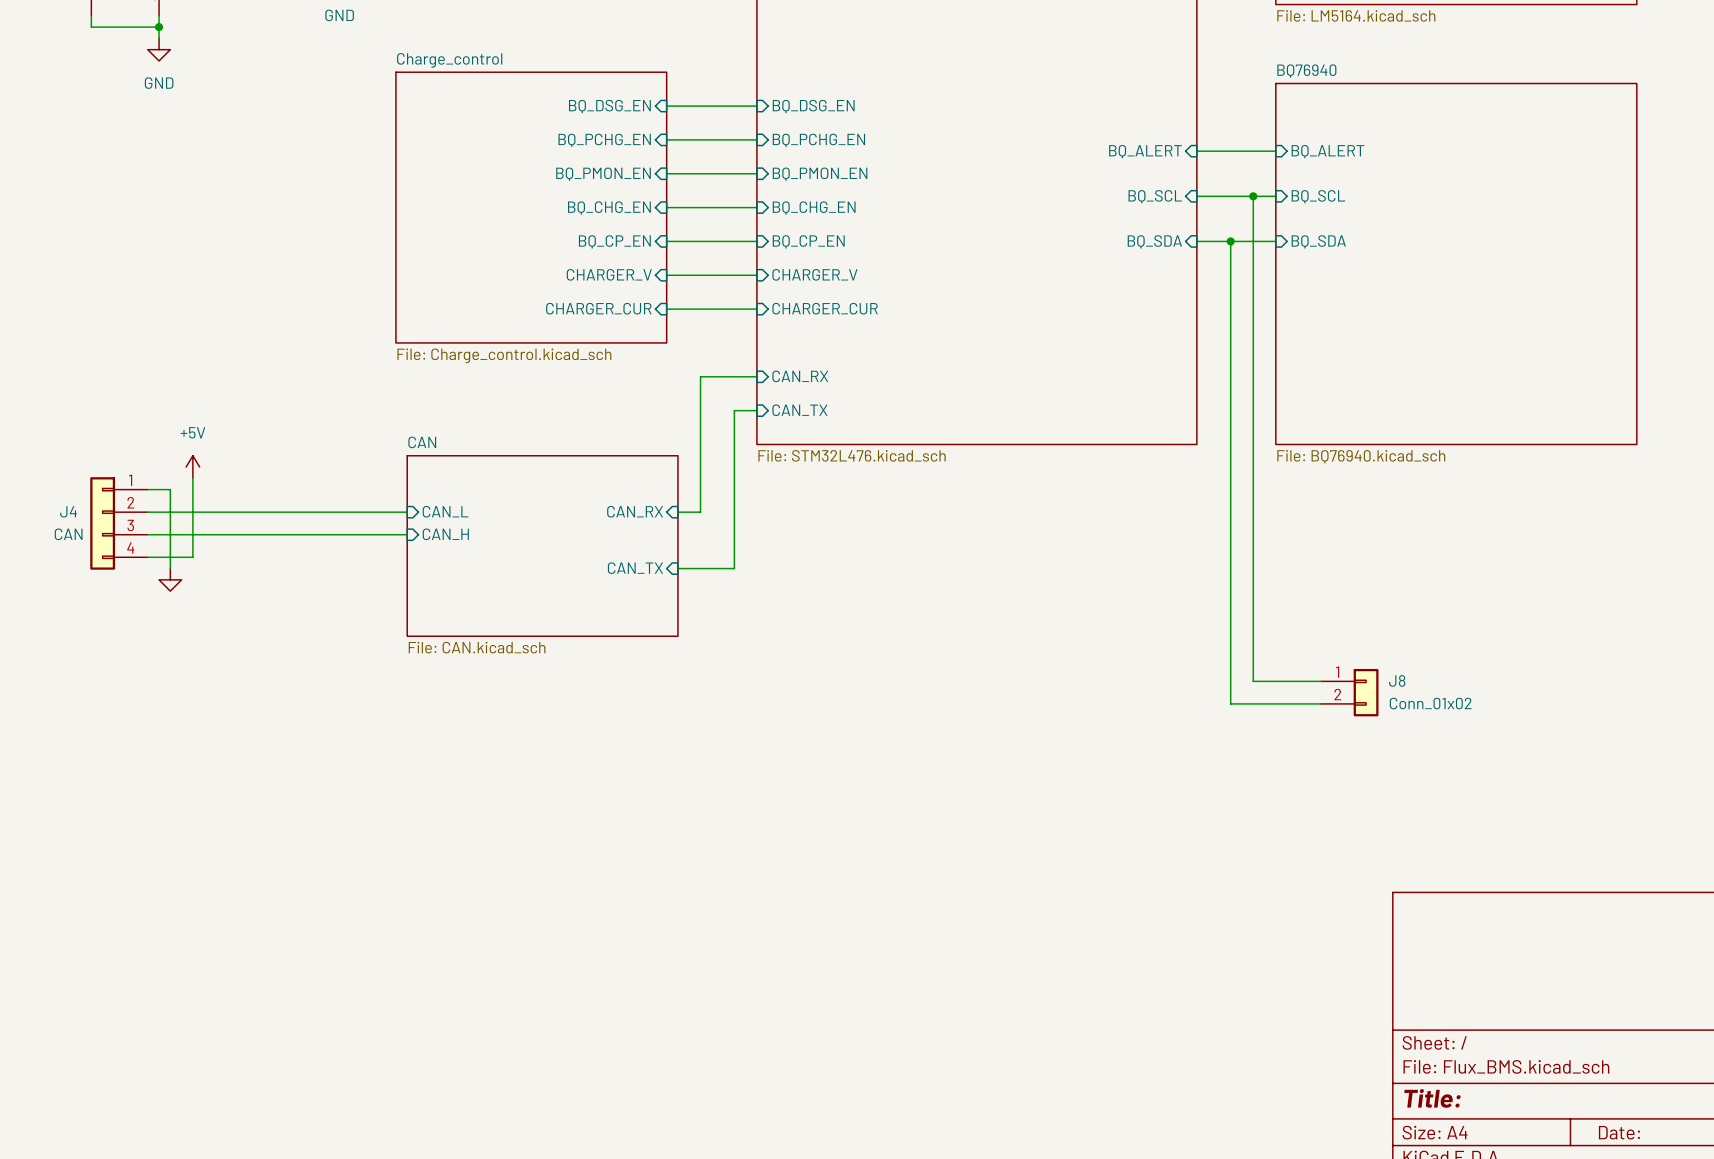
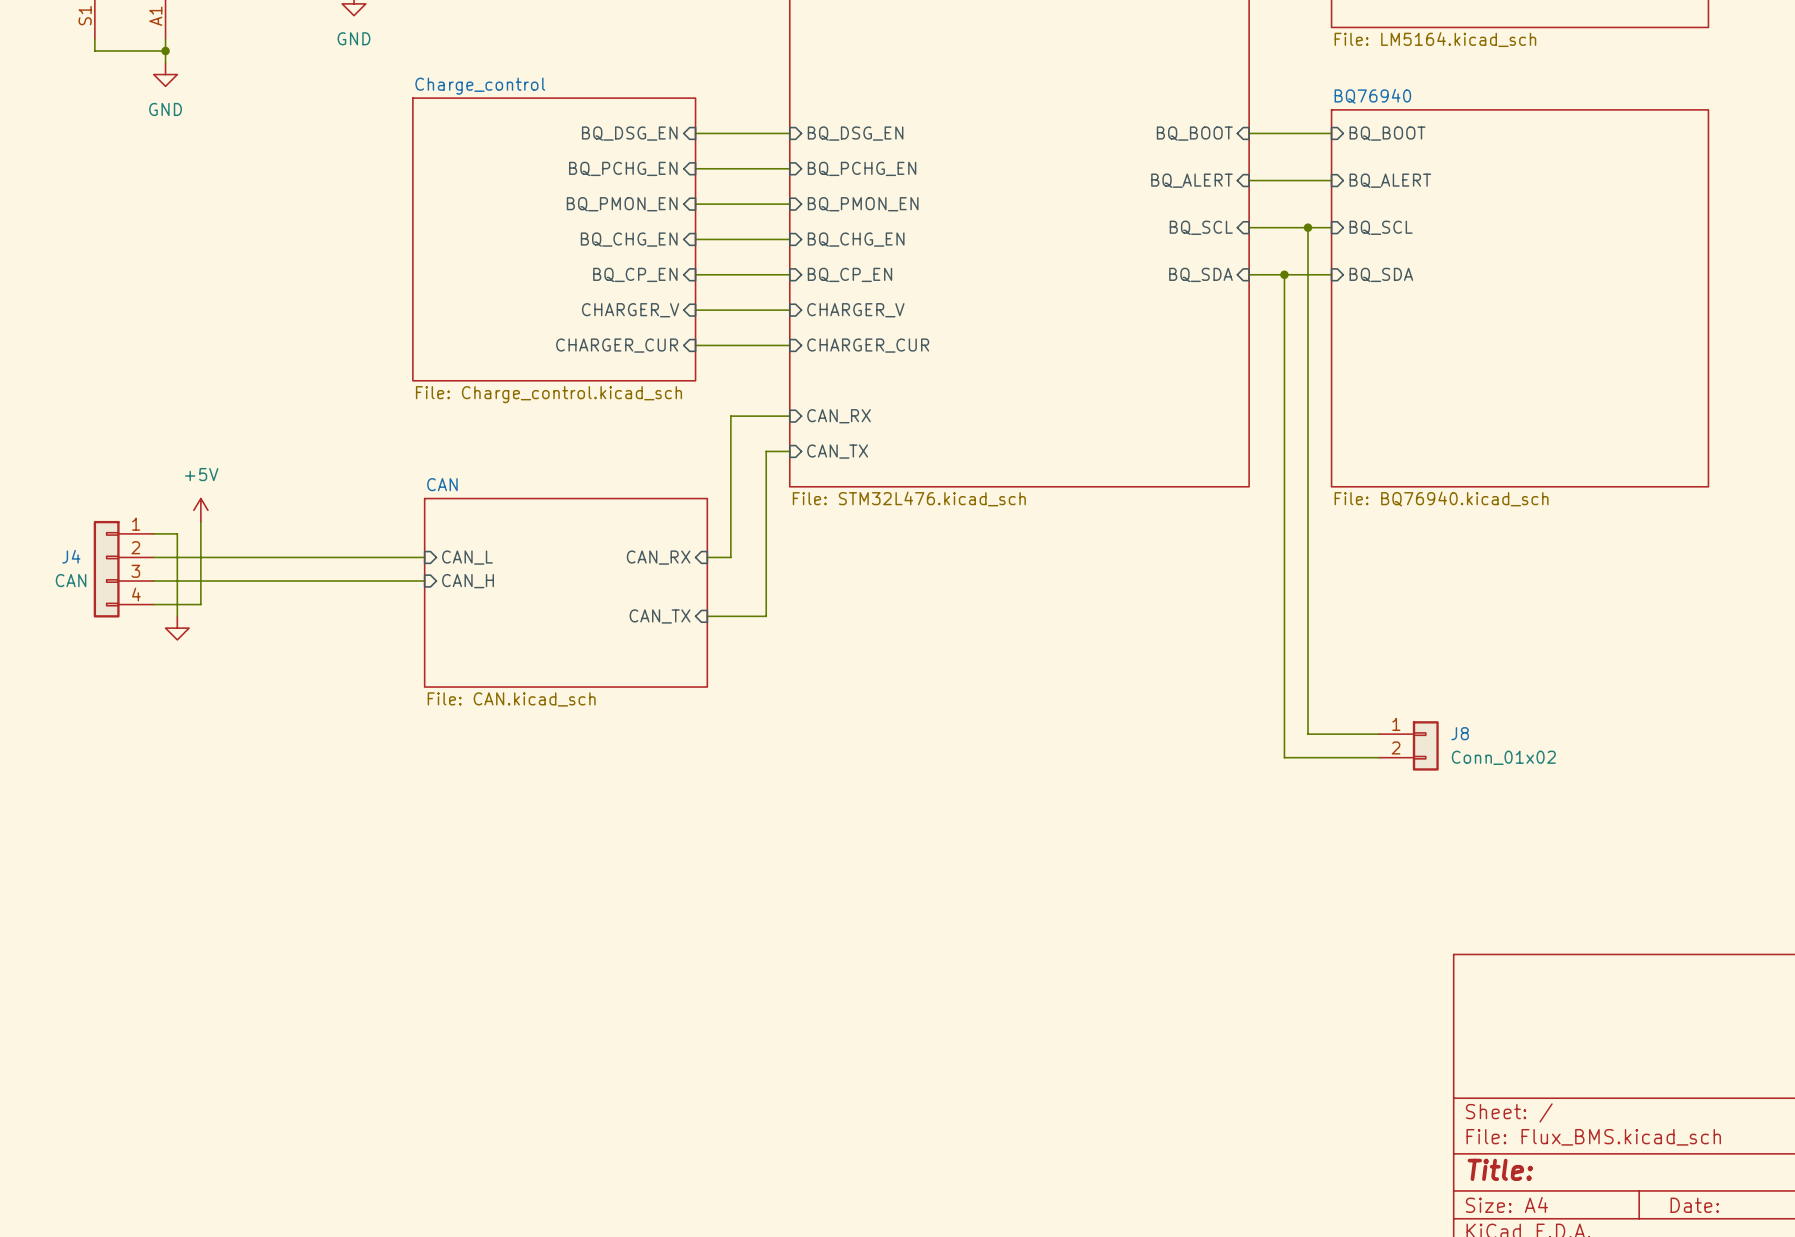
sheet pin: none -> BQ_BOOT (1194, 133)
wire: none -> (1249, 133) (1331, 133)
sheet pin: none -> BQ_BOOT (1387, 133)

